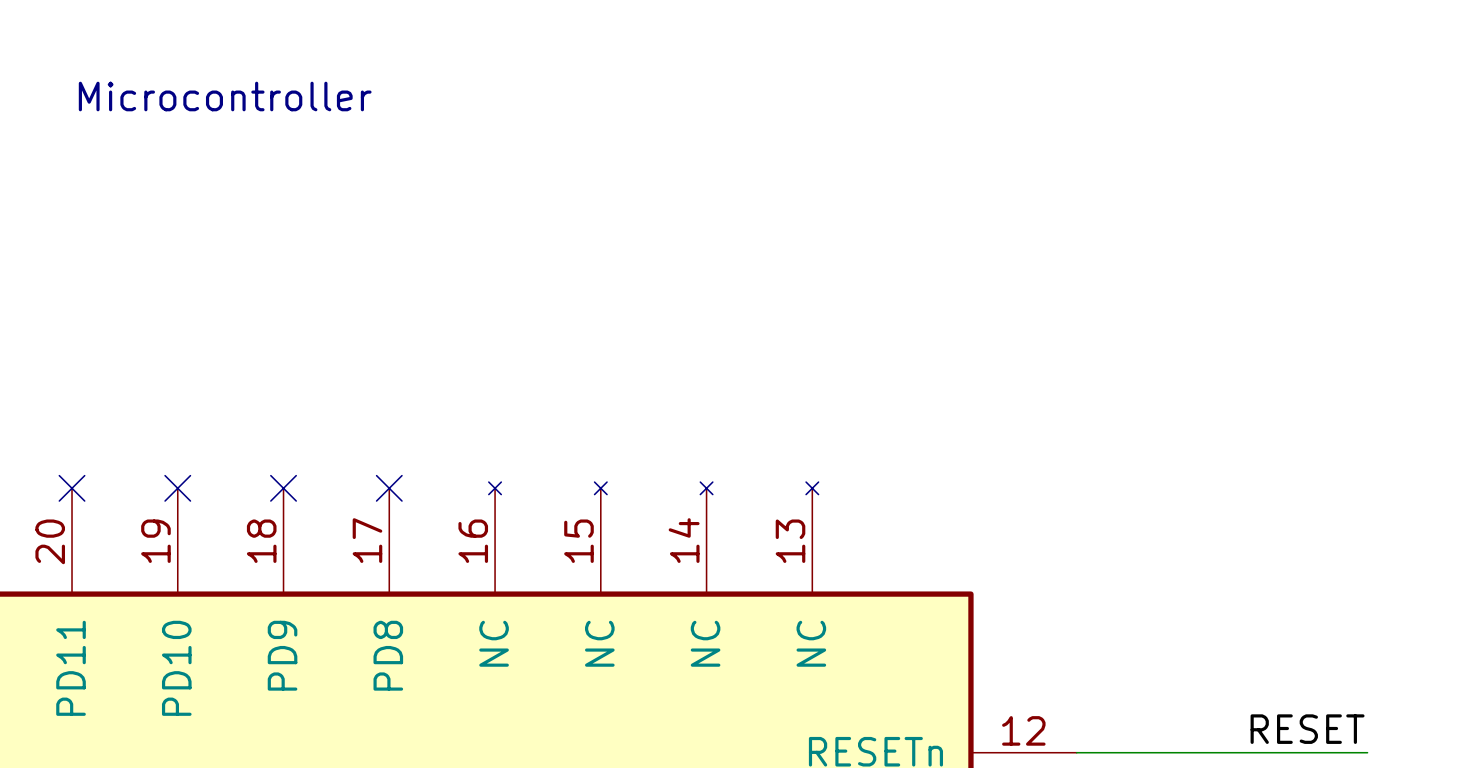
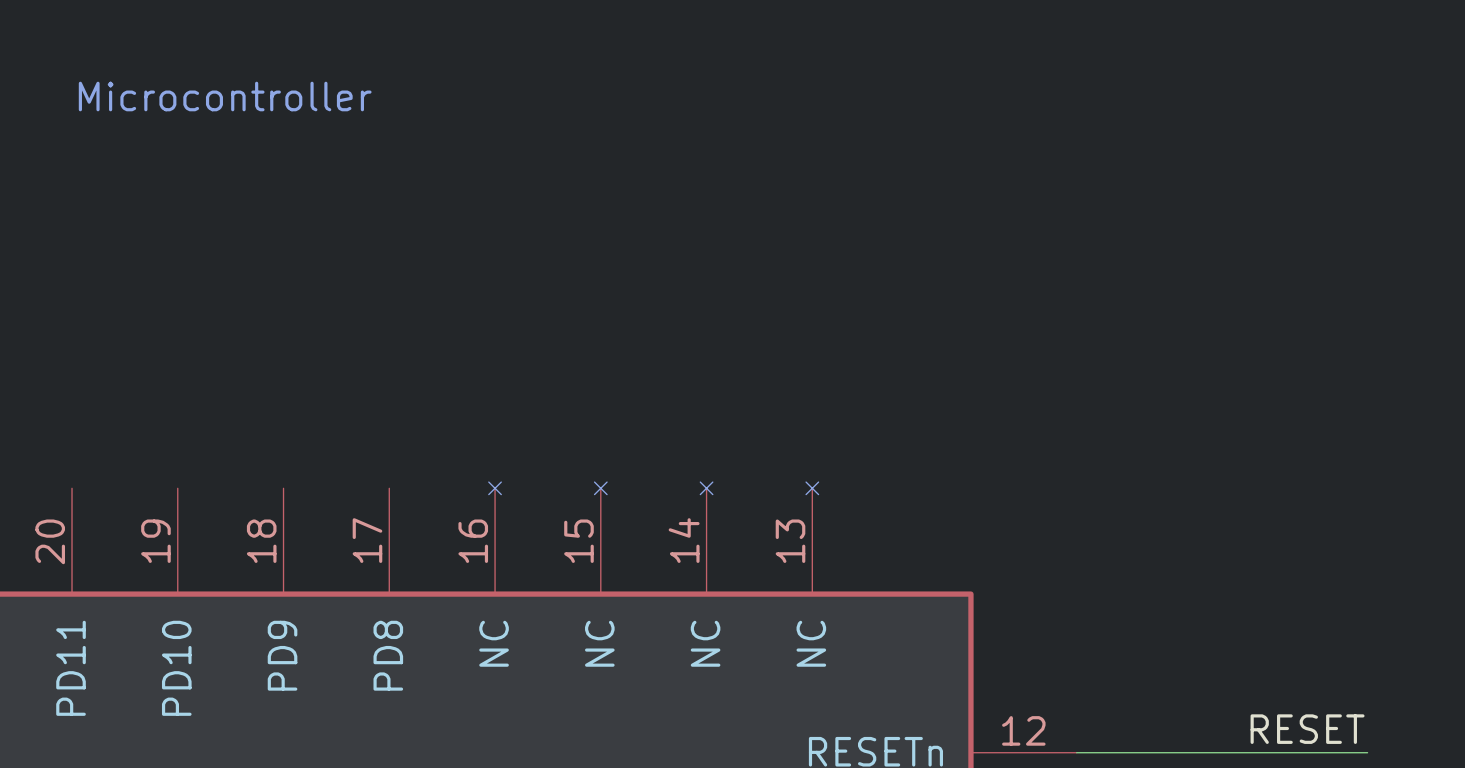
no-connect mark: (72, 488) -> none
no-connect mark: (177, 488) -> none
no-connect mark: (283, 488) -> none
no-connect mark: (389, 488) -> none

